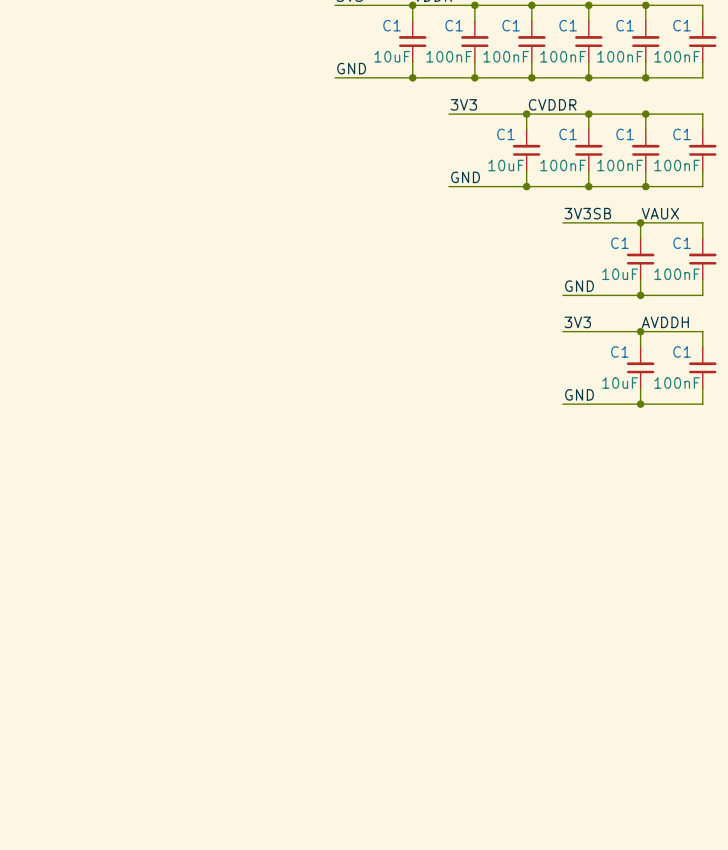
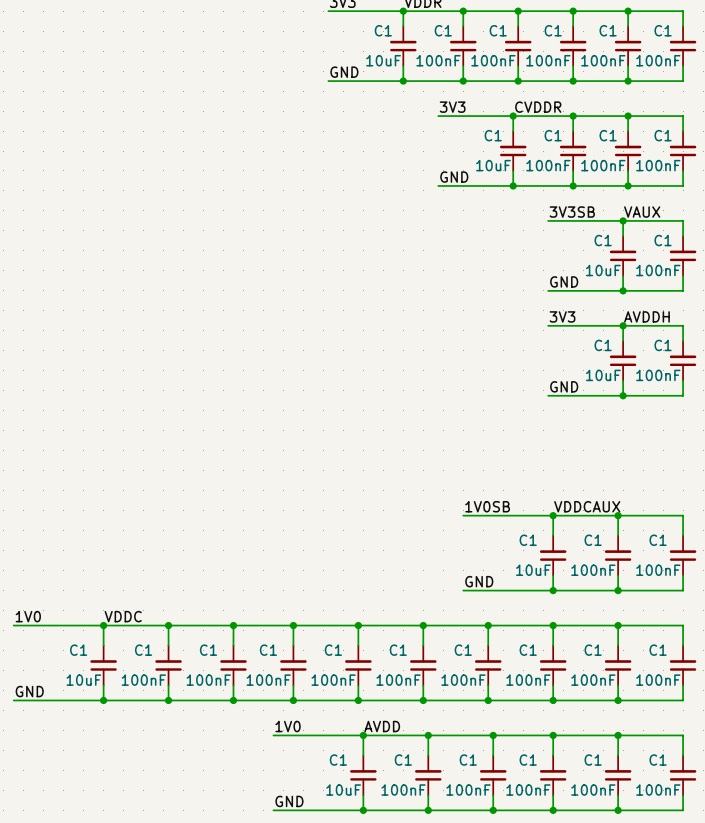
label: none -> 1V0SB (487, 506)
label: none -> VDDCAUX (587, 506)
wire: none -> (463, 515) (683, 515) (683, 535)
wire: none -> (553, 515) (553, 535)
junction: none -> (553, 515)
wire: none -> (618, 515) (618, 535)
junction: none -> (618, 515)
C1: none -> 10uF (553, 555)
C1: none -> 100nF (618, 555)
C1: none -> 100nF (683, 555)
wire: none -> (553, 575) (553, 590)
wire: none -> (618, 575) (618, 590)
wire: none -> (683, 575) (683, 590) (463, 590)
label: none -> GND (479, 581)
junction: none -> (553, 590)
junction: none -> (618, 590)
label: none -> 1V0 (28, 616)
label: none -> VDDC (123, 616)
wire: none -> (13, 625) (683, 625) (683, 645)
wire: none -> (103, 625) (103, 645)
junction: none -> (103, 625)
wire: none -> (168, 625) (168, 645)
junction: none -> (168, 625)
wire: none -> (233, 625) (233, 645)
junction: none -> (233, 625)
wire: none -> (293, 625) (293, 645)
junction: none -> (293, 625)
wire: none -> (358, 625) (358, 645)
junction: none -> (358, 625)
wire: none -> (423, 625) (423, 645)
junction: none -> (423, 625)
wire: none -> (488, 625) (488, 645)
junction: none -> (488, 625)
wire: none -> (553, 625) (553, 645)
junction: none -> (553, 625)
wire: none -> (618, 625) (618, 645)
junction: none -> (618, 625)
C1: none -> 10uF (103, 665)
C1: none -> 100nF (168, 665)
C1: none -> 100nF (233, 665)
C1: none -> 100nF (293, 665)
C1: none -> 100nF (358, 665)
C1: none -> 100nF (423, 665)
C1: none -> 100nF (488, 665)
C1: none -> 100nF (553, 665)
C1: none -> 100nF (618, 665)
C1: none -> 100nF (683, 665)
wire: none -> (103, 685) (103, 700)
wire: none -> (168, 685) (168, 700)
wire: none -> (233, 685) (233, 700)
wire: none -> (293, 685) (293, 700)
wire: none -> (358, 685) (358, 700)
wire: none -> (423, 685) (423, 700)
wire: none -> (488, 685) (488, 700)
wire: none -> (553, 685) (553, 700)
wire: none -> (618, 685) (618, 700)
wire: none -> (683, 685) (683, 700) (13, 700)
label: none -> GND (29, 691)
junction: none -> (103, 700)
junction: none -> (168, 700)
junction: none -> (233, 700)
junction: none -> (293, 700)
junction: none -> (358, 700)
junction: none -> (423, 700)
junction: none -> (488, 700)
junction: none -> (553, 700)
junction: none -> (618, 700)
label: none -> 1V0 (288, 726)
label: none -> AVDD (382, 726)
wire: none -> (273, 735) (683, 735) (683, 755)
wire: none -> (363, 735) (363, 755)
junction: none -> (363, 735)
wire: none -> (428, 735) (428, 755)
junction: none -> (428, 735)
wire: none -> (493, 735) (493, 755)
junction: none -> (493, 735)
wire: none -> (553, 735) (553, 755)
junction: none -> (553, 735)
wire: none -> (618, 735) (618, 755)
junction: none -> (618, 735)
C1: none -> 10uF (363, 775)
C1: none -> 100nF (428, 775)
C1: none -> 100nF (493, 775)
C1: none -> 100nF (553, 775)
C1: none -> 100nF (618, 775)
C1: none -> 100nF (683, 775)
wire: none -> (363, 795) (363, 810)
wire: none -> (428, 795) (428, 810)
wire: none -> (493, 795) (493, 810)
wire: none -> (553, 795) (553, 810)
wire: none -> (618, 795) (618, 810)
wire: none -> (683, 795) (683, 810) (273, 810)
label: none -> GND (289, 801)
junction: none -> (363, 810)
junction: none -> (428, 810)
junction: none -> (493, 810)
junction: none -> (553, 810)
junction: none -> (618, 810)

